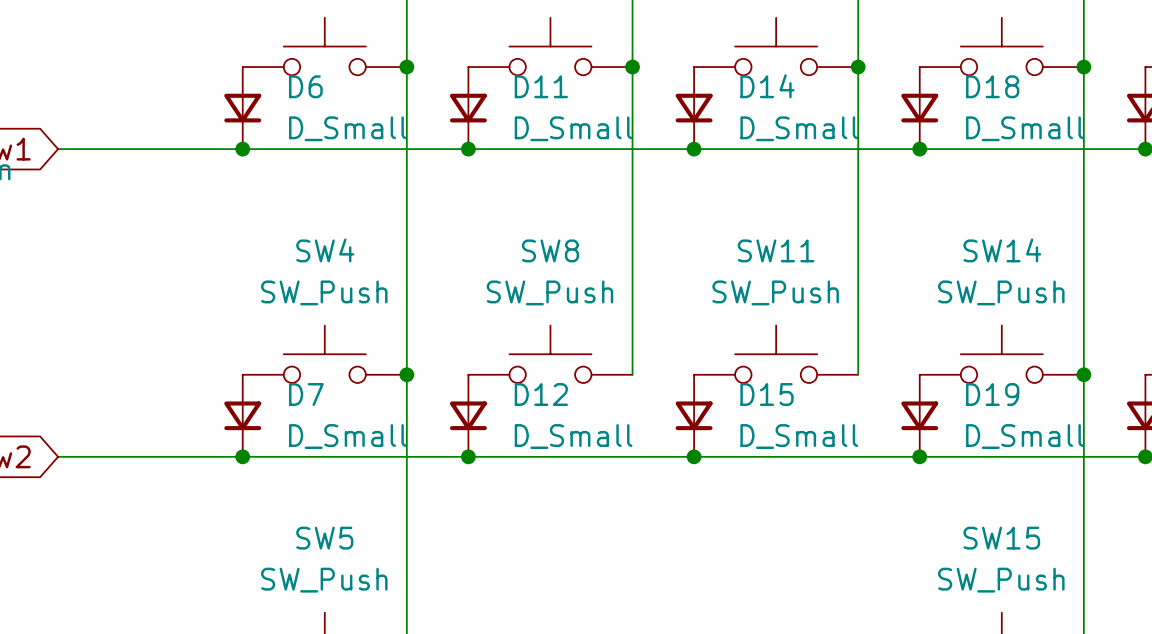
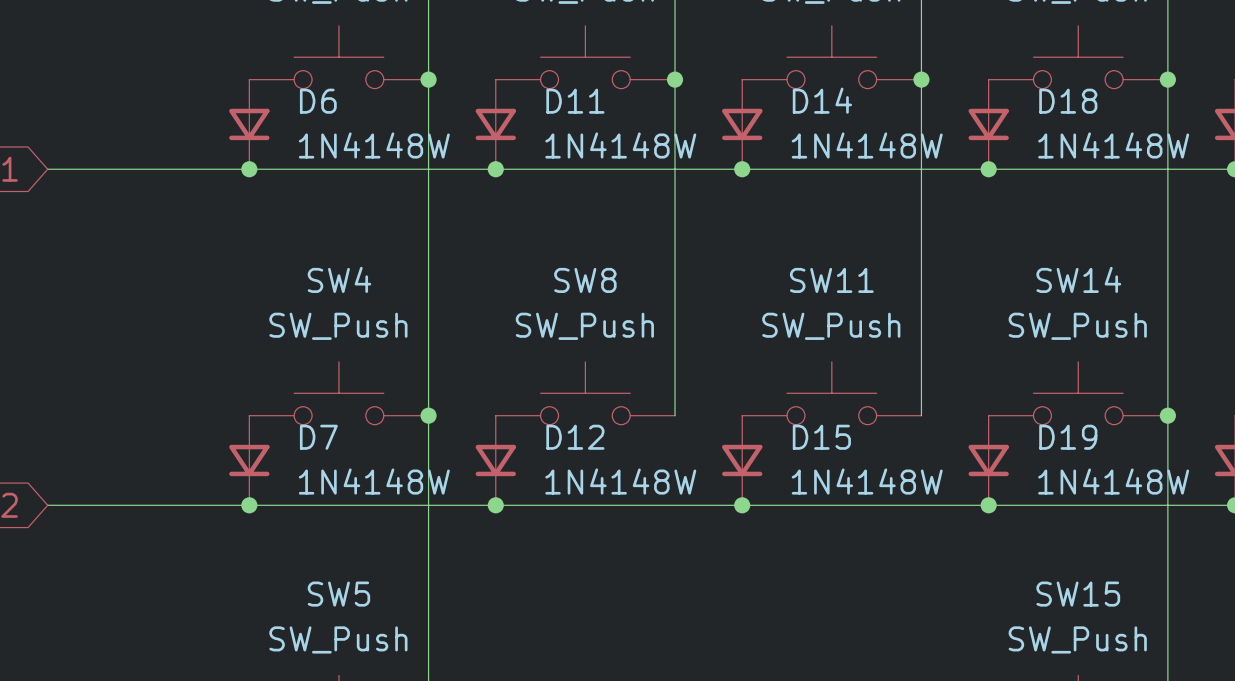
D6 value: D_Small (347, 128) -> 1N4148W (374, 145)
D11 value: D_Small (573, 128) -> 1N4148W (620, 145)
D14 value: D_Small (799, 128) -> 1N4148W (867, 145)
D18 value: D_Small (1024, 128) -> 1N4148W (1113, 145)
D7 value: D_Small (347, 436) -> 1N4148W (374, 481)
D12 value: D_Small (573, 436) -> 1N4148W (620, 481)
D15 value: D_Small (799, 436) -> 1N4148W (867, 481)
D19 value: D_Small (1024, 436) -> 1N4148W (1113, 481)

